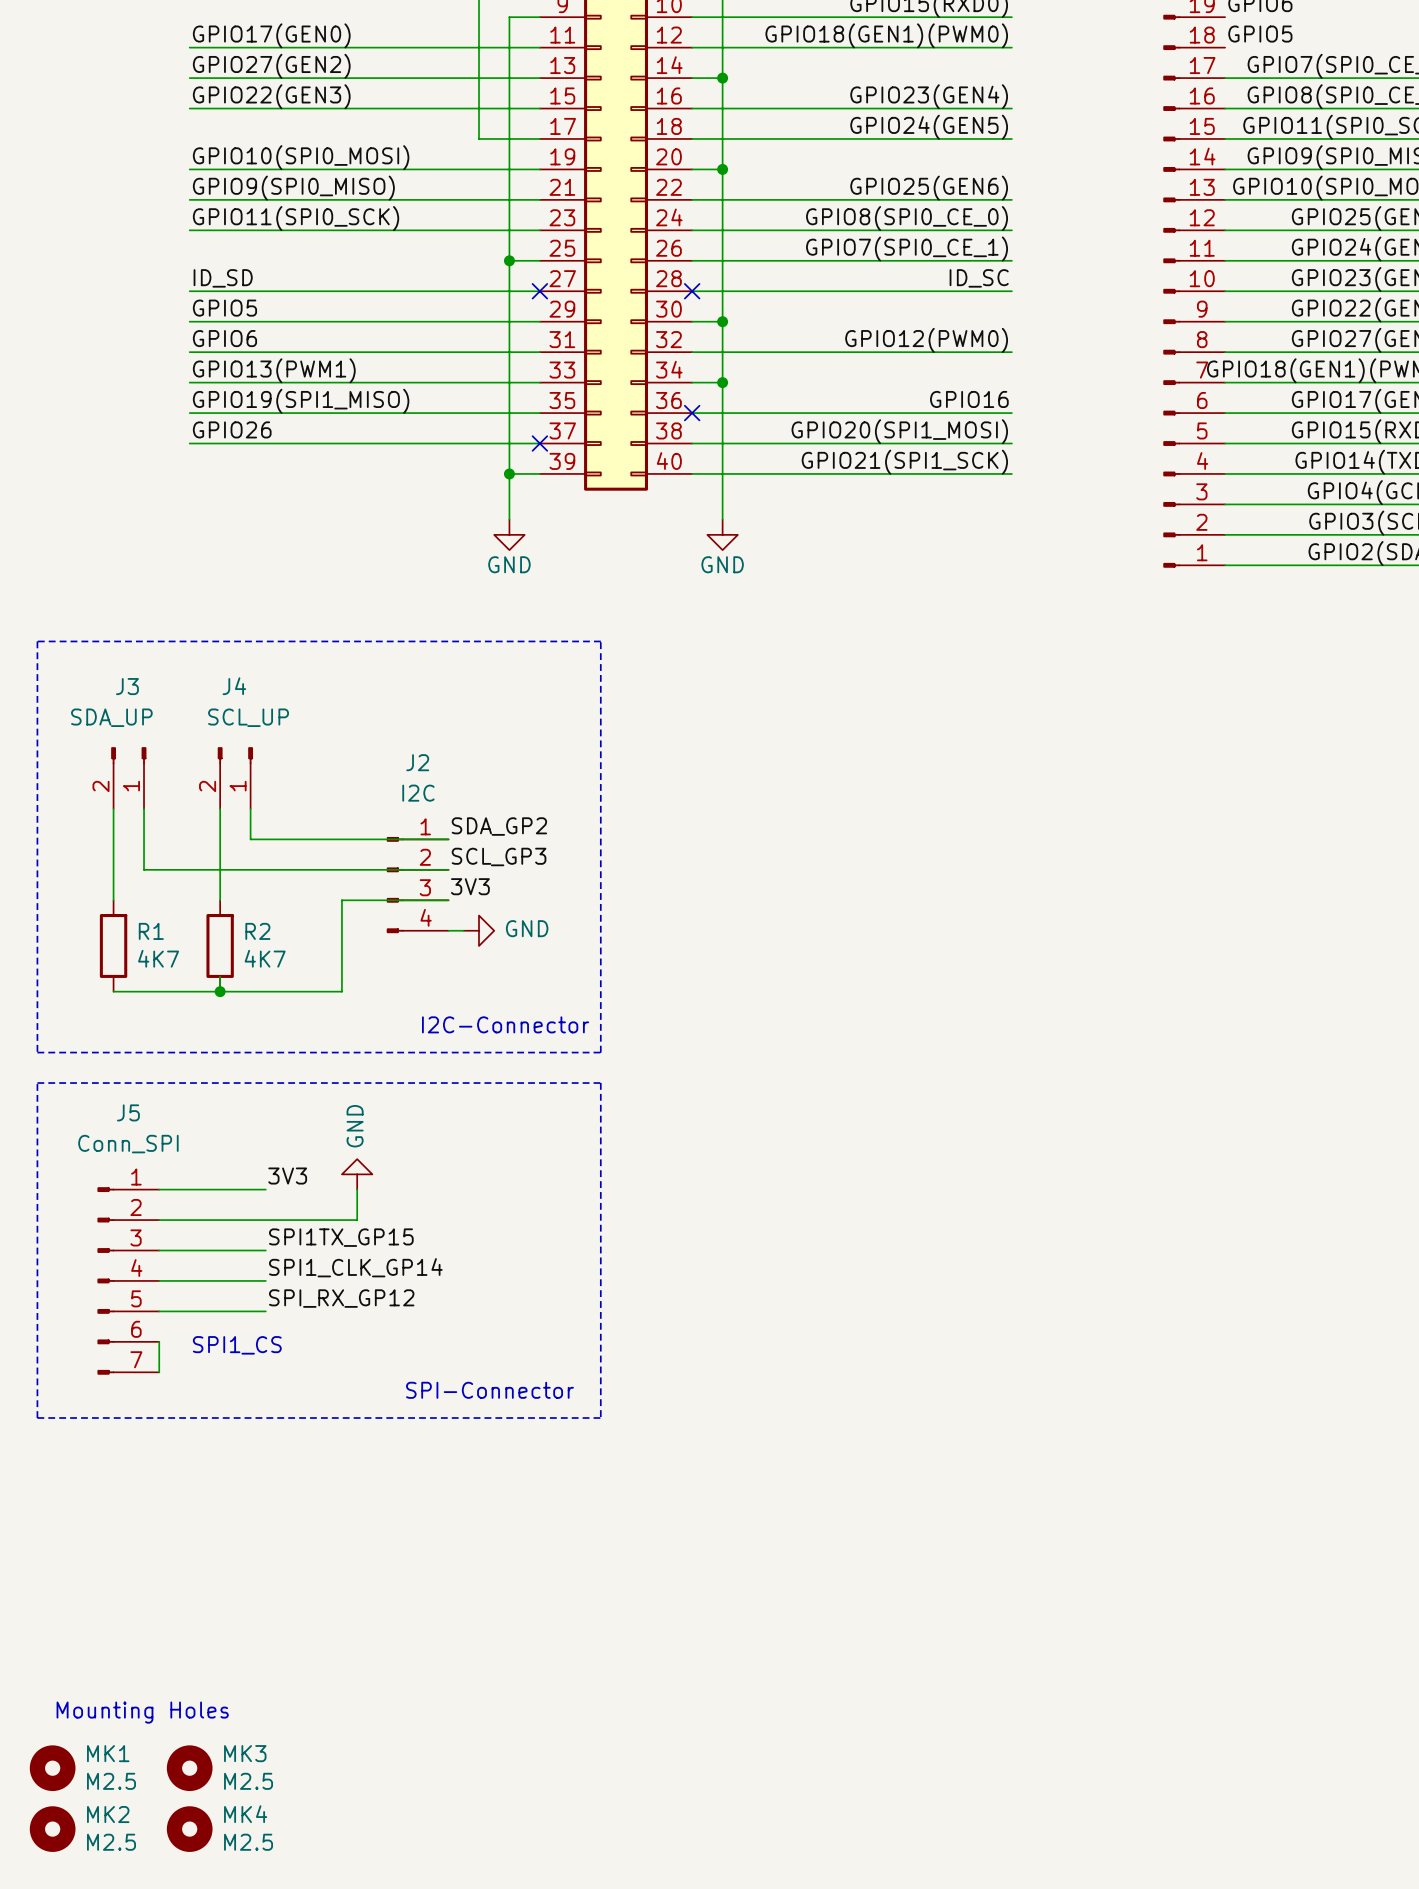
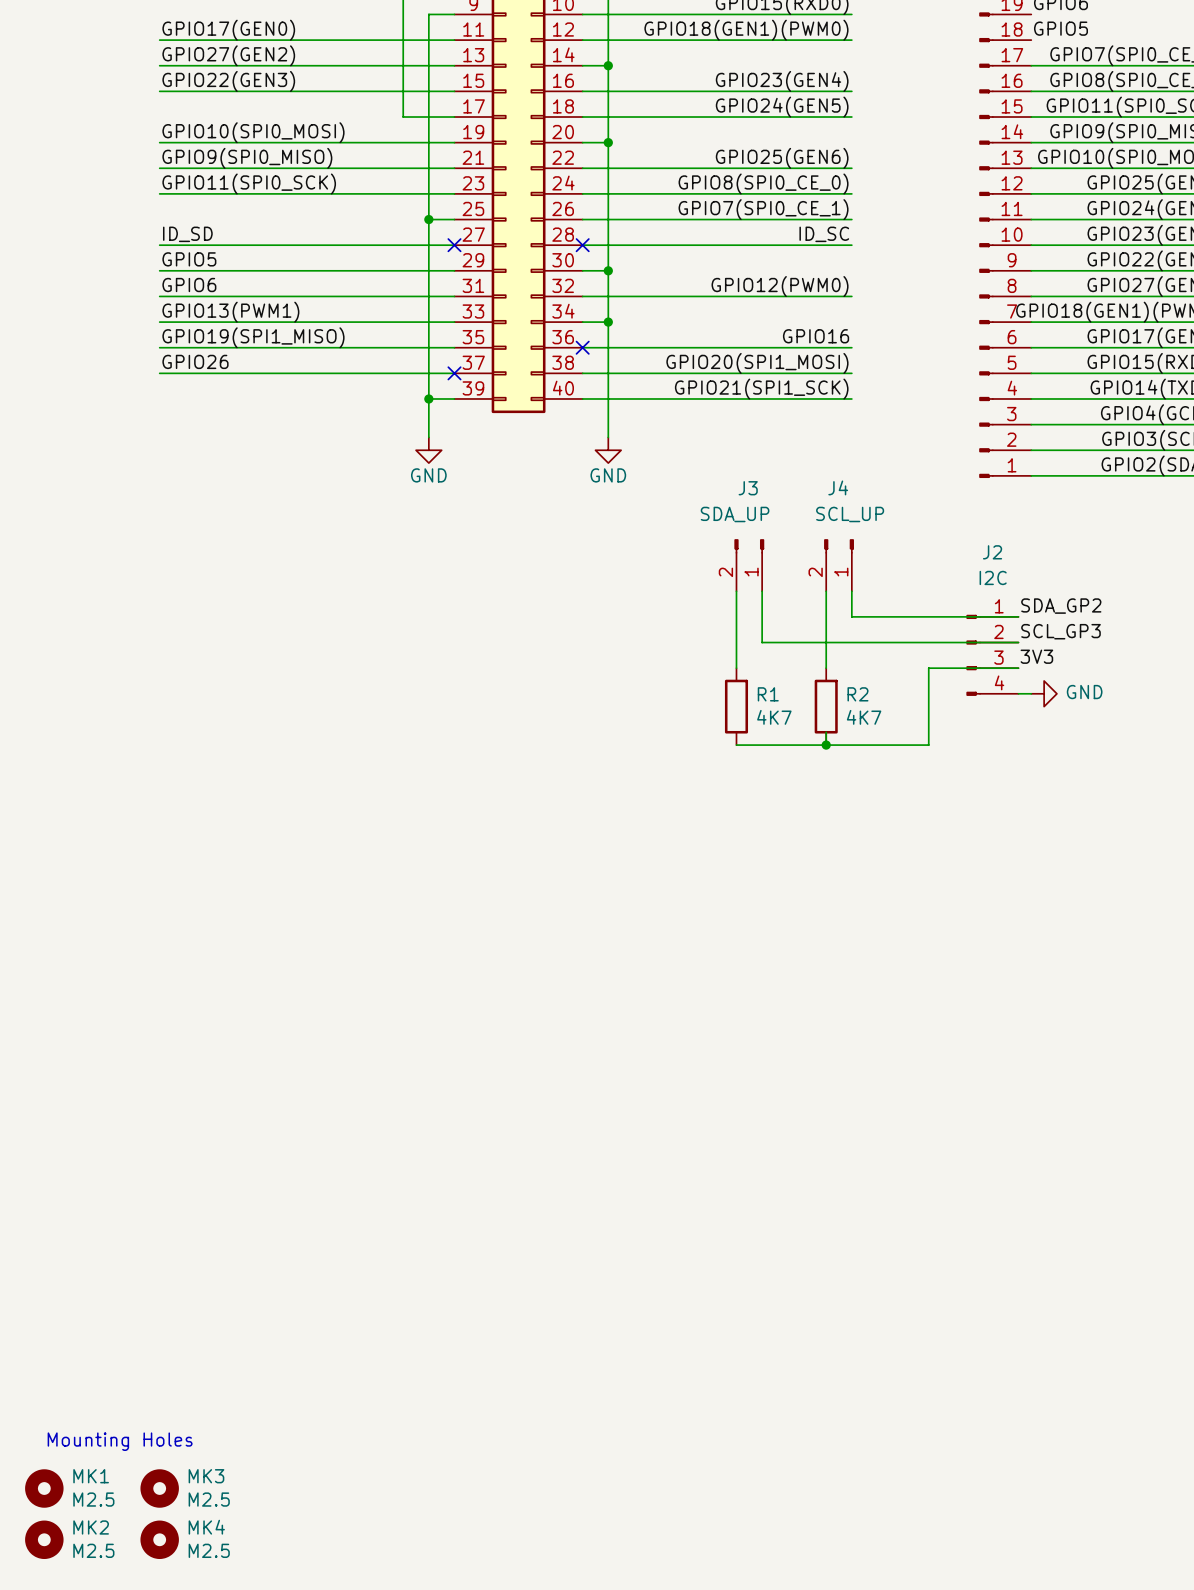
line: (37, 641) (37, 1052) (600, 1052) (600, 641) (37, 641) -> none
wire: none -> (736, 591) (736, 668)
wire: none -> (762, 591) (762, 642) (1018, 642)
wire: none -> (826, 591) (826, 668)
wire: none -> (851, 591) (851, 616) (1018, 616)
label: none -> SDA_GP2 (1061, 606)
label: none -> SCL_GP3 (1060, 631)
J3 position: (128, 778) -> (749, 565)
J4 position: (235, 778) -> (839, 565)
label: none -> 3V3 (1036, 656)
wire: none -> (1018, 668) (928, 668) (928, 745) (736, 745)
wire: (113, 808) (113, 900) -> none
wire: (144, 808) (144, 869) (448, 869) -> none
wire: (220, 808) (220, 900) -> none
wire: (250, 808) (250, 839) (448, 839) -> none
wire: none -> (1018, 693) (1031, 693)
power symbol: none -> GND (1044, 693)
label: SDA_GP2 (499, 826) -> none
label: SCL_GP3 (499, 856) -> none
wire: none -> (826, 732) (826, 745)
J2 position: (417, 885) -> (992, 655)
junction: none -> (826, 745)
label: 3V3 (470, 886) -> none
wire: (448, 900) (341, 900) (341, 991) (113, 991) -> none
wire: (448, 930) (463, 930) -> none
power symbol: GND (478, 930) -> none
R1 position: (113, 945) -> (736, 706)
R2 position: (220, 945) -> (826, 706)
wire: (220, 976) (220, 991) -> none
junction: (220, 991) -> none
text: I2C-Connector (505, 1024) -> none
line: (37, 1083) (37, 1417) (600, 1417) (600, 1083) (37, 1083) -> none
power symbol: GND (357, 1174) -> none
label: 3V3 (287, 1176) -> none
wire: (159, 1189) (265, 1189) -> none
wire: (357, 1189) (357, 1220) (159, 1220) -> none
label: SPI1TX_GP15 (341, 1237) -> none
wire: (159, 1250) (265, 1250) -> none
label: SPI1_CLK_GP14 (355, 1267) -> none
J5: Conn_SPI (128, 1280) -> none
wire: (159, 1280) (265, 1280) -> none
label: SPI_RX_GP12 (341, 1298) -> none
wire: (159, 1311) (265, 1311) -> none
wire: (159, 1341) (159, 1372) -> none
text: SPI1_CS (237, 1345) -> none
text: SPI-Connector (489, 1390) -> none

